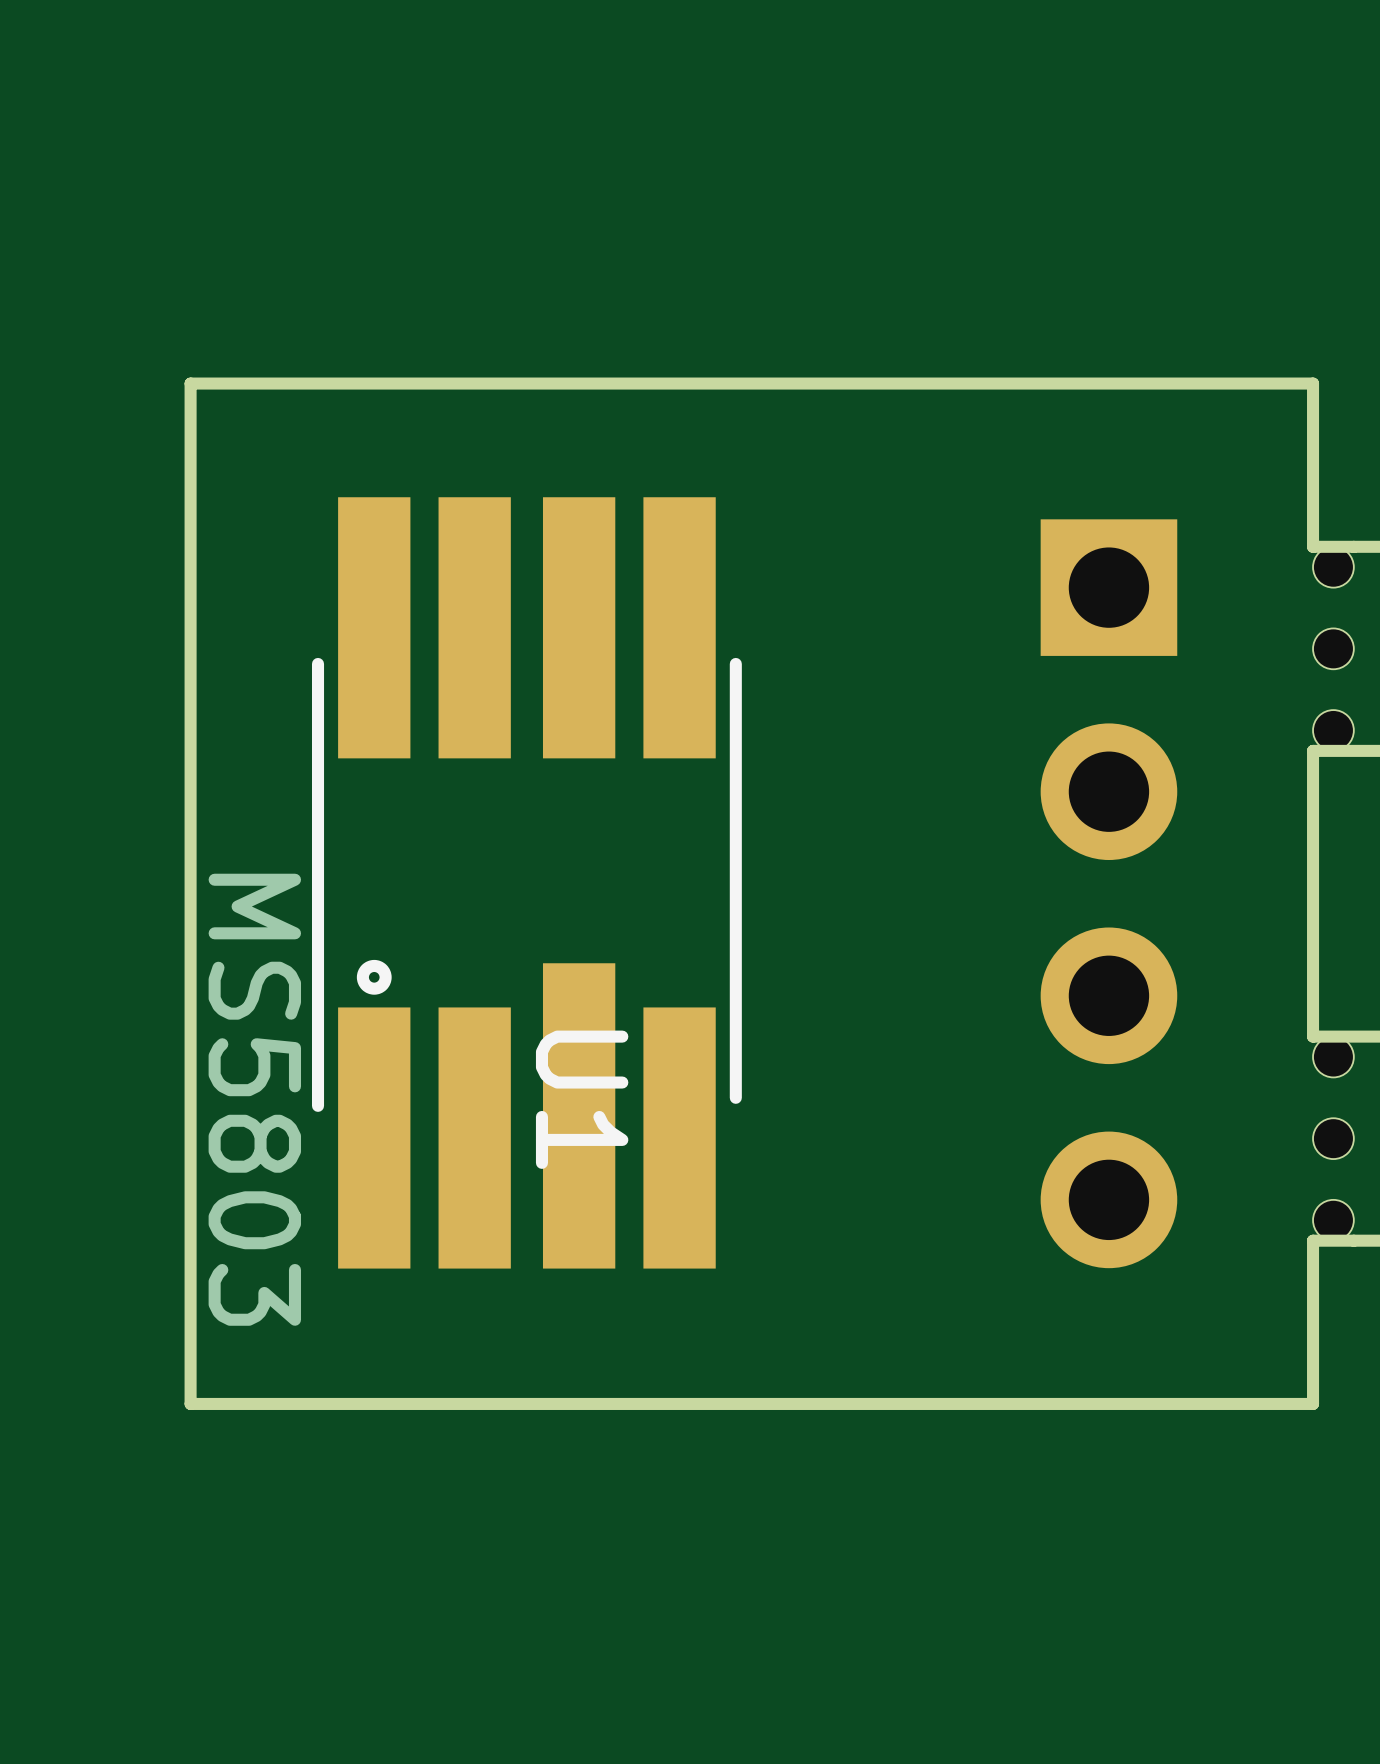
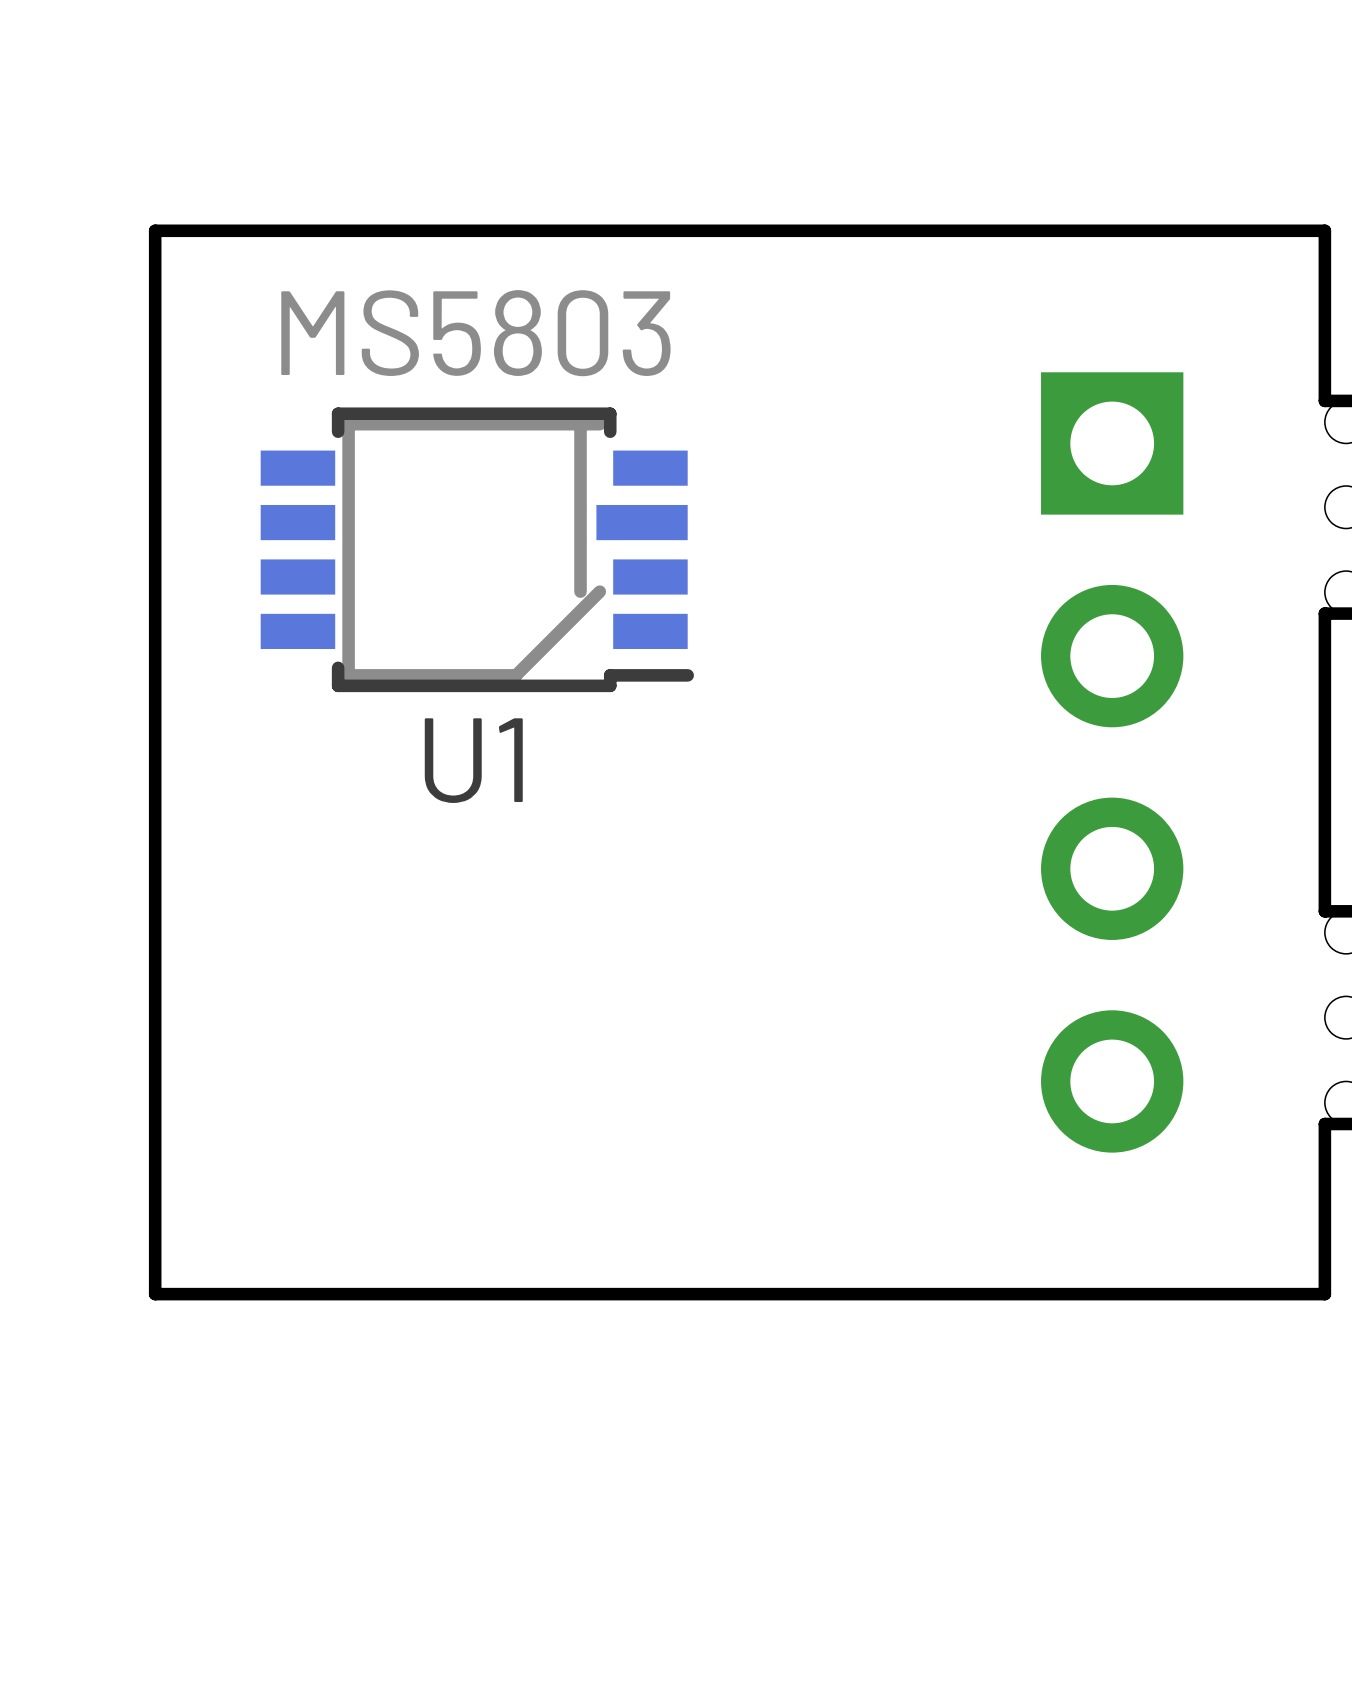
U1 footprint: [311, 497, 742, 1269] -> [260, 407, 694, 693]
U1 value position: MS5803 (254, 1099) -> MS5803 (475, 333)

